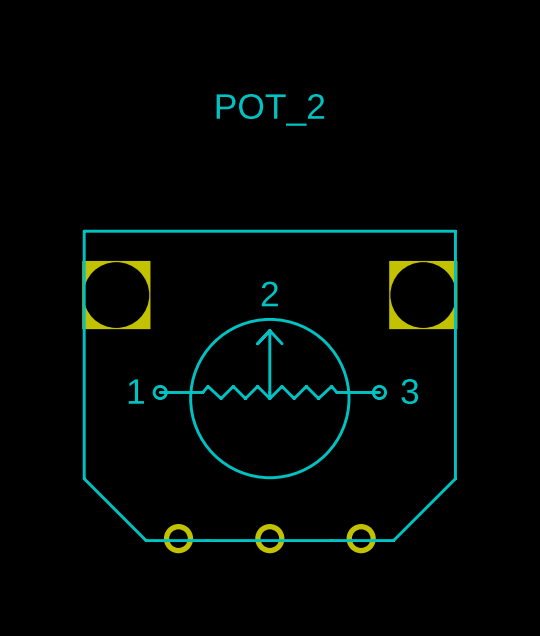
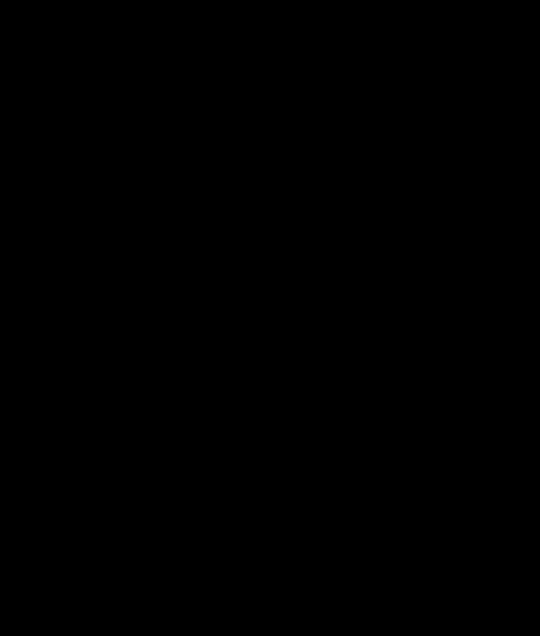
POT_2: (269, 391) -> none

